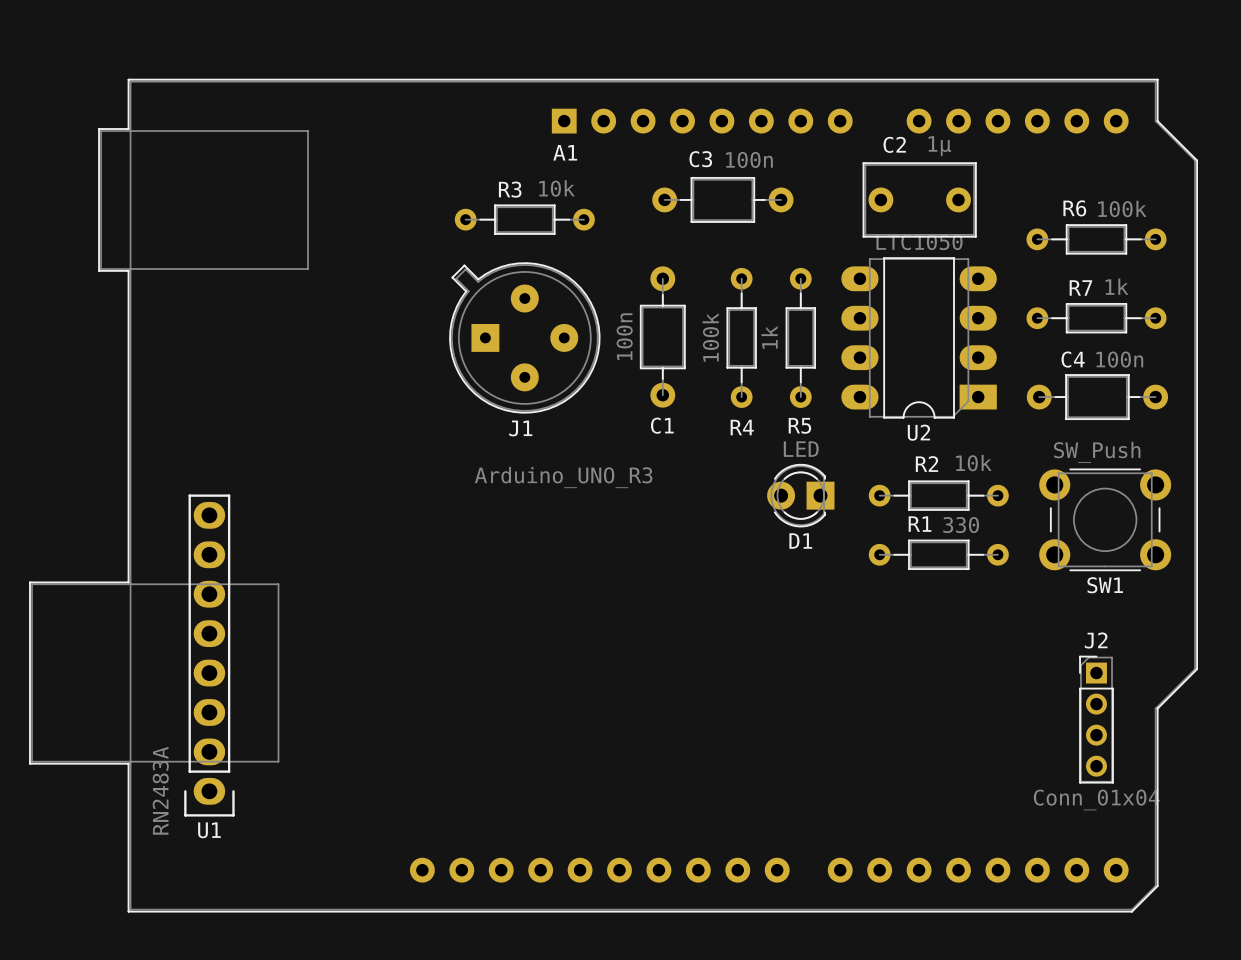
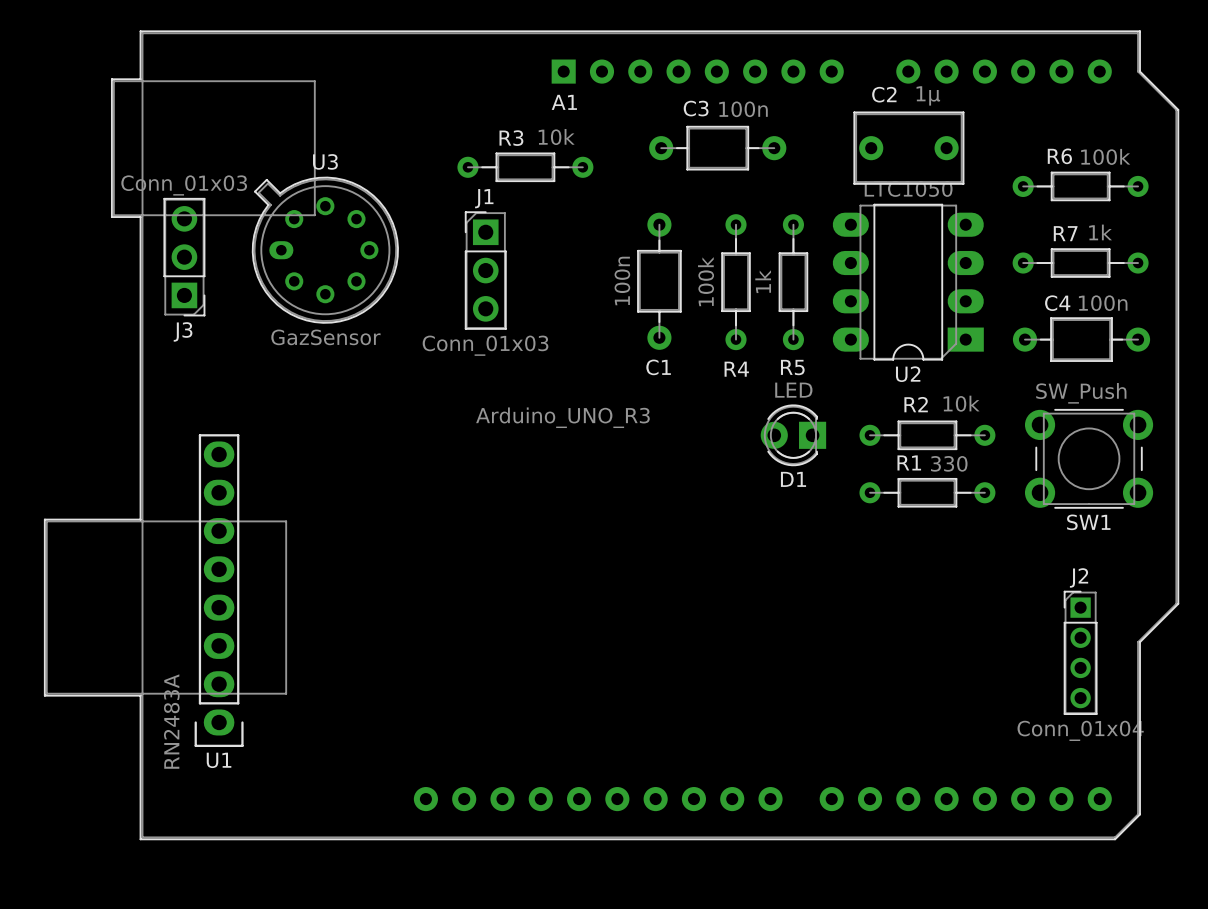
J1 footprint: [449, 262, 601, 414] -> [464, 211, 507, 330]
U3: none -> GazSensor (325, 250)
J3: none -> Conn_01x03 (184, 257)
J1 value: none -> Conn_01x03 (485, 345)
J1 name position: J1 (520, 428) -> J1 (484, 198)

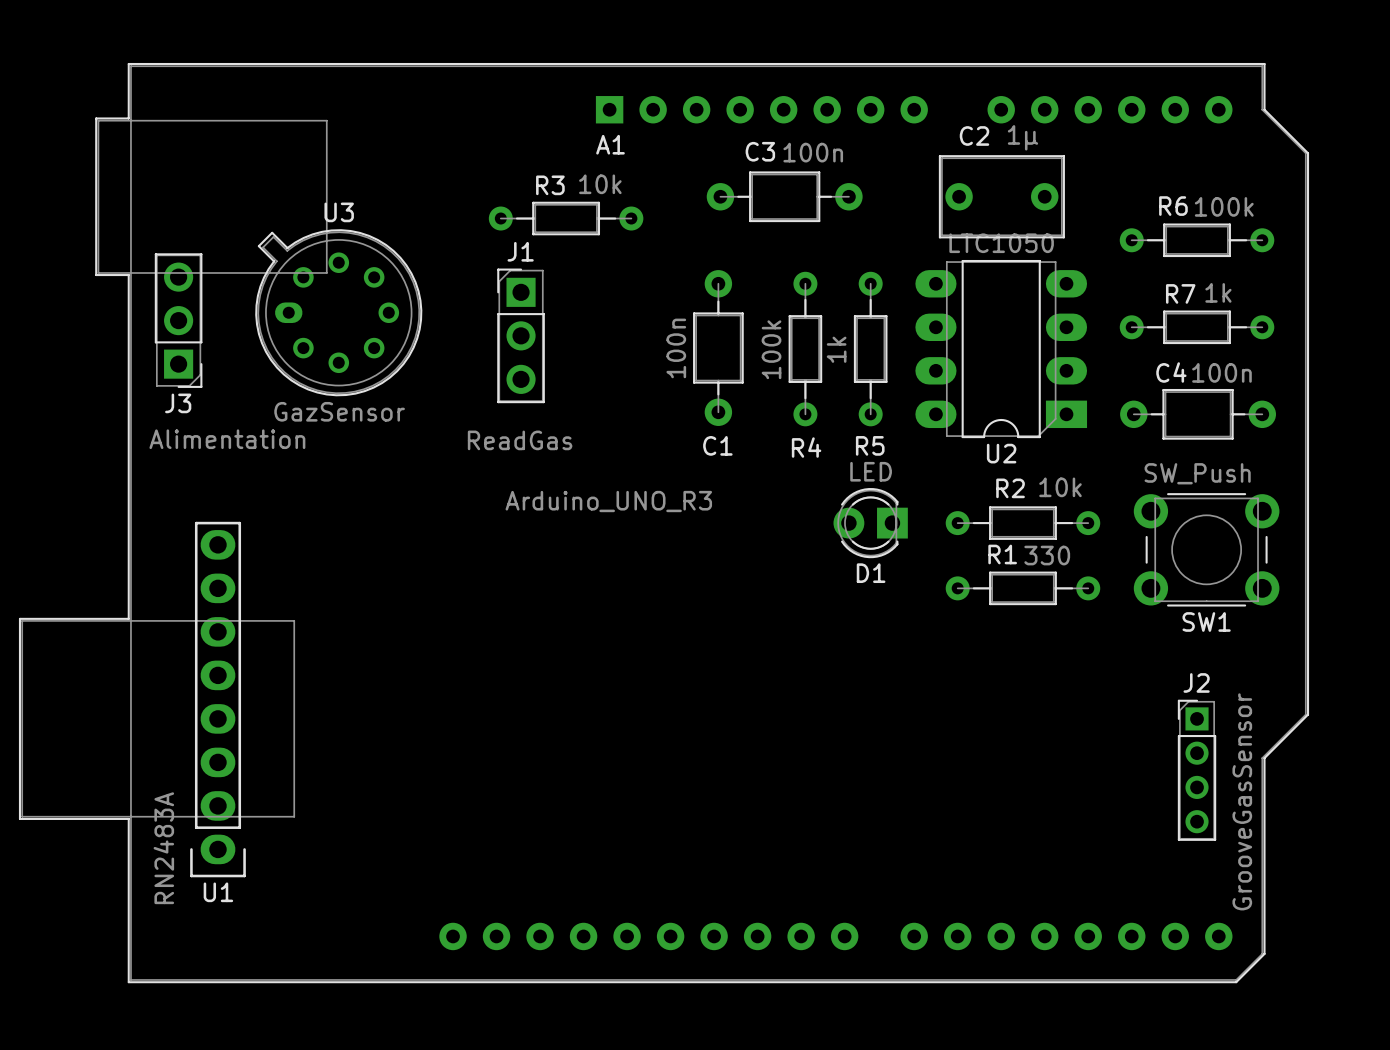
J3 value: Conn_01x03 (184, 185) -> Alimentation (227, 439)
J1 value: Conn_01x03 (485, 345) -> ReadGas (520, 440)
J2 value: Conn_01x04 (1080, 730) -> GrooveGasSensor (1242, 801)

